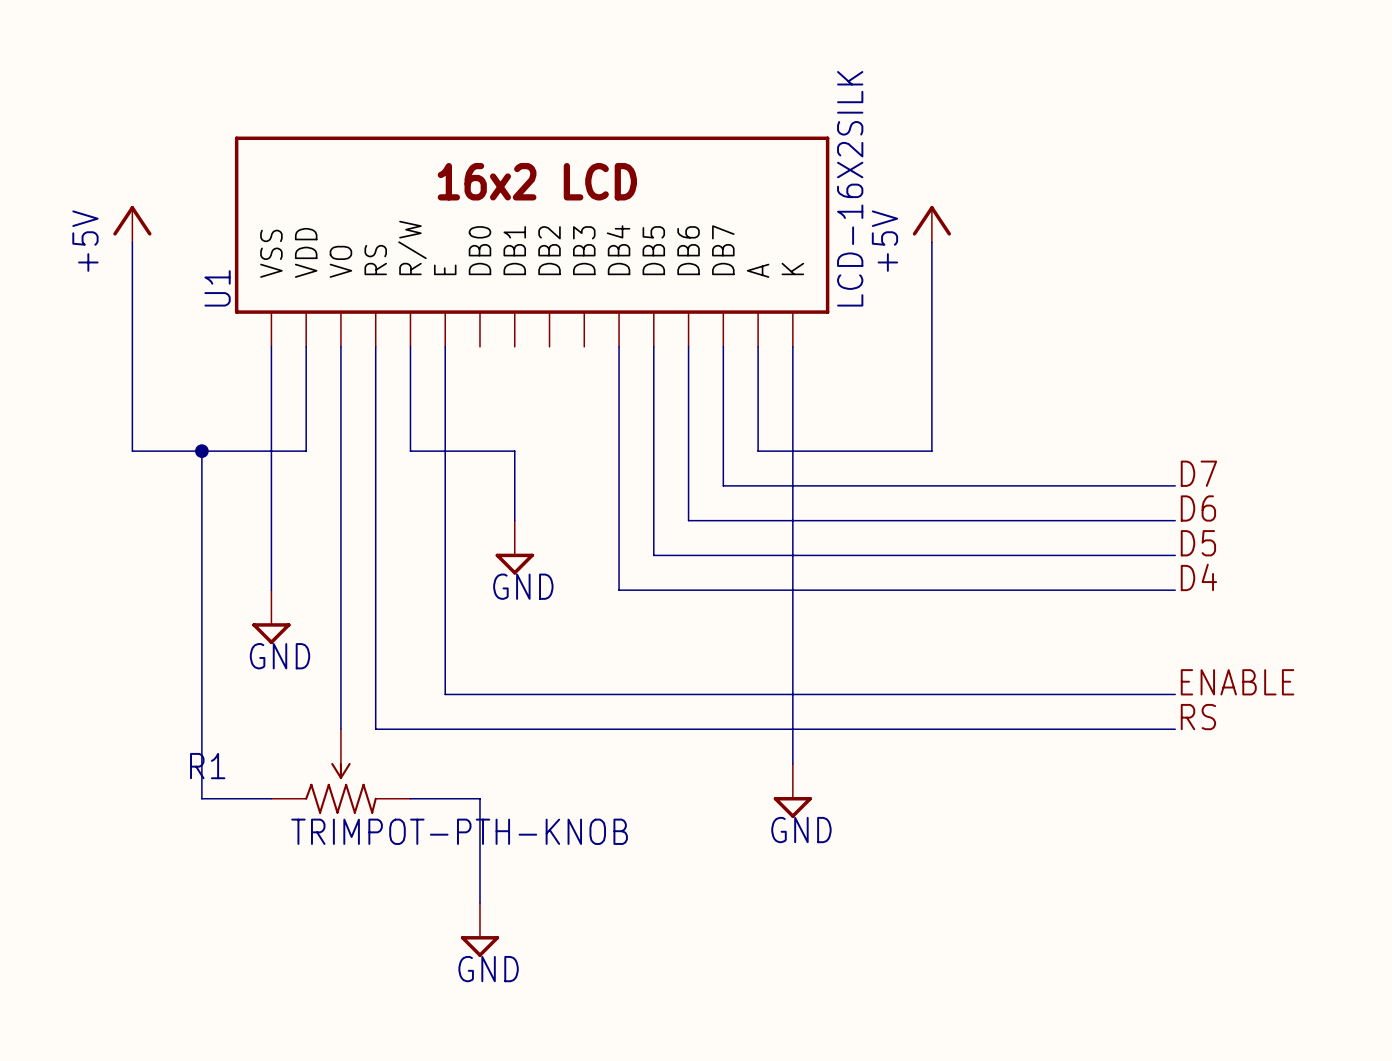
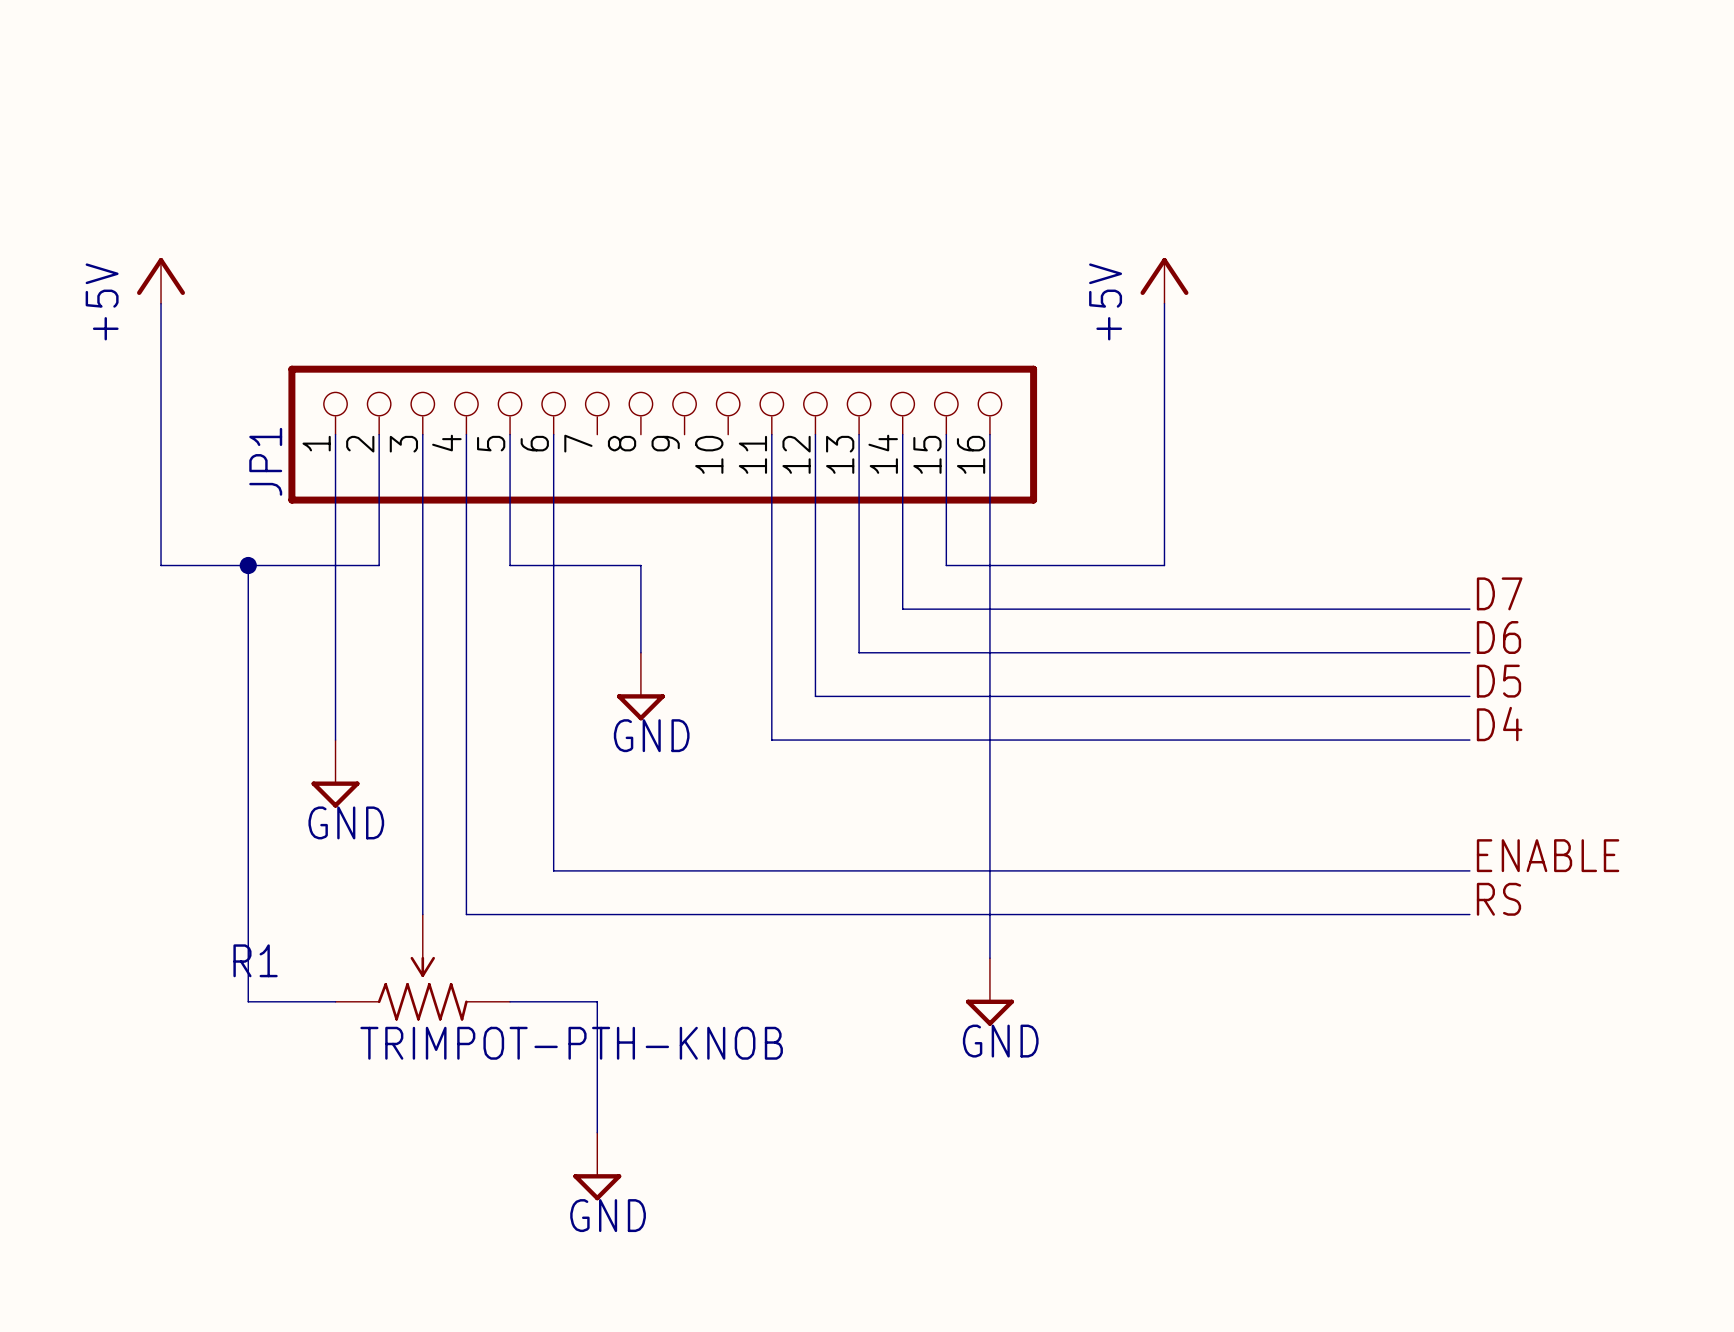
U1: LCD-16X2SILK (532, 241) -> none
JP1: none -> (662, 434)

